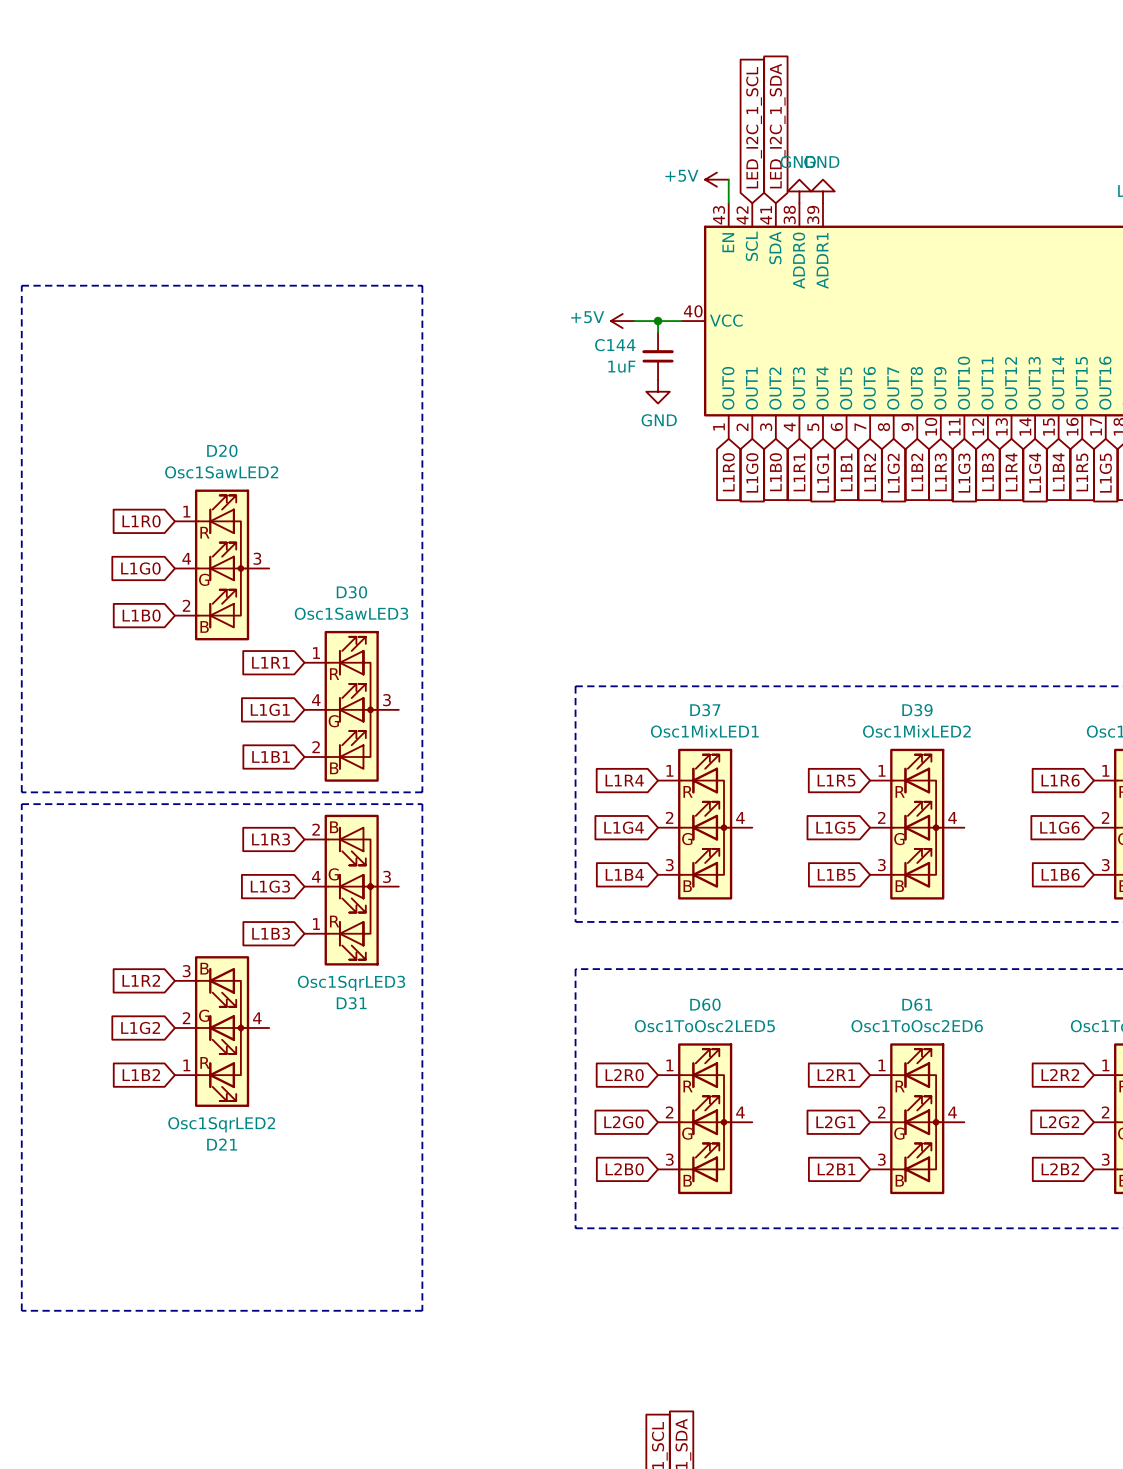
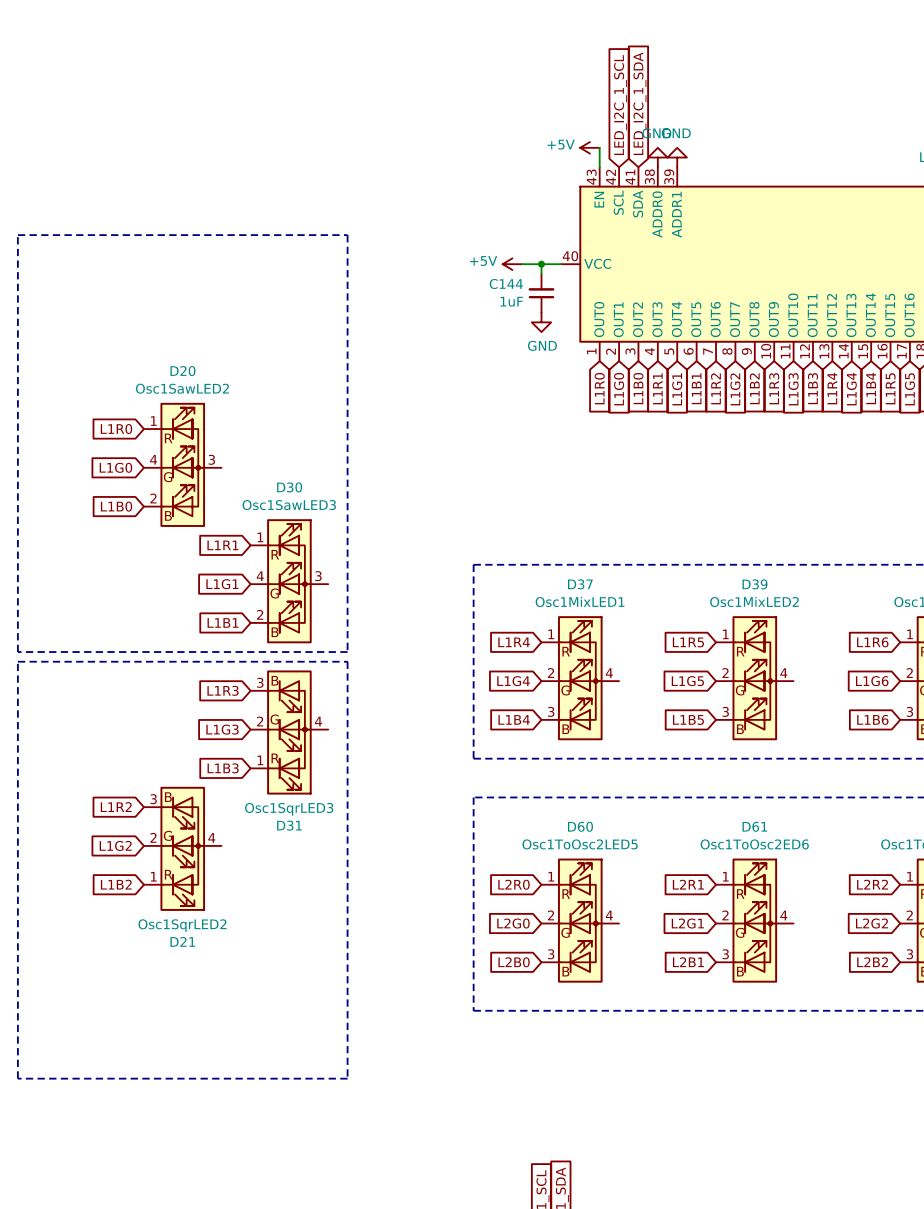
D31 symbol: [304, 814, 399, 966] -> [250, 670, 329, 795]

